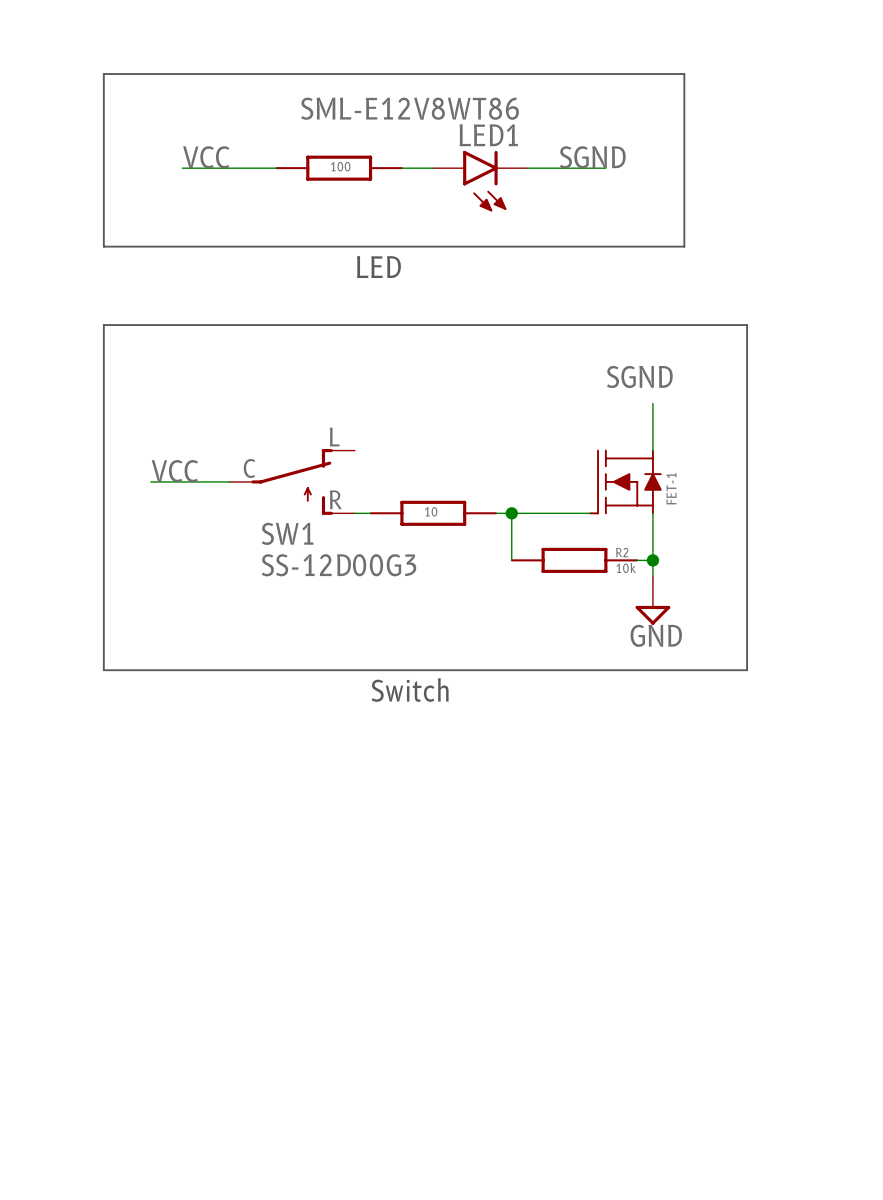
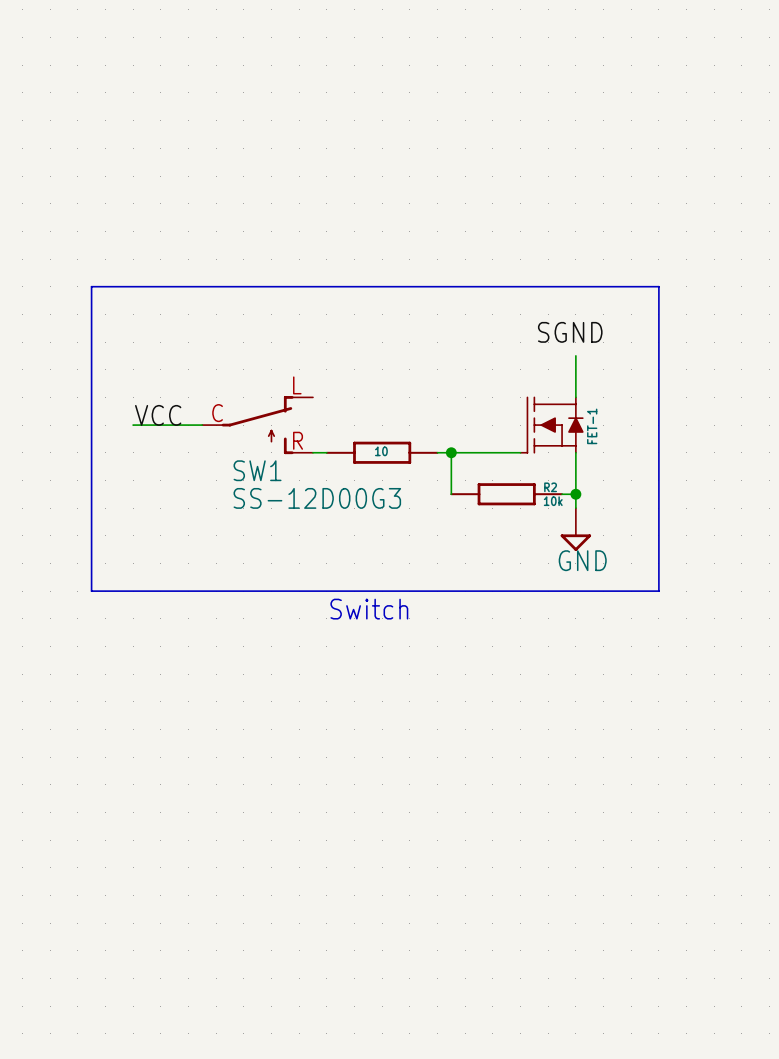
line: (103, 74) (103, 246) (684, 246) (684, 74) (103, 74) -> none
label: VCC (206, 157) -> none
label: SGND (592, 157) -> none
wire: (182, 168) (276, 168) -> none
part: (339, 168) -> none
wire: (401, 168) (433, 168) -> none
wire: (527, 168) (605, 168) -> none
LED1: SML-E12V8WT86 (480, 181) -> none
text: LED (378, 267) -> none

